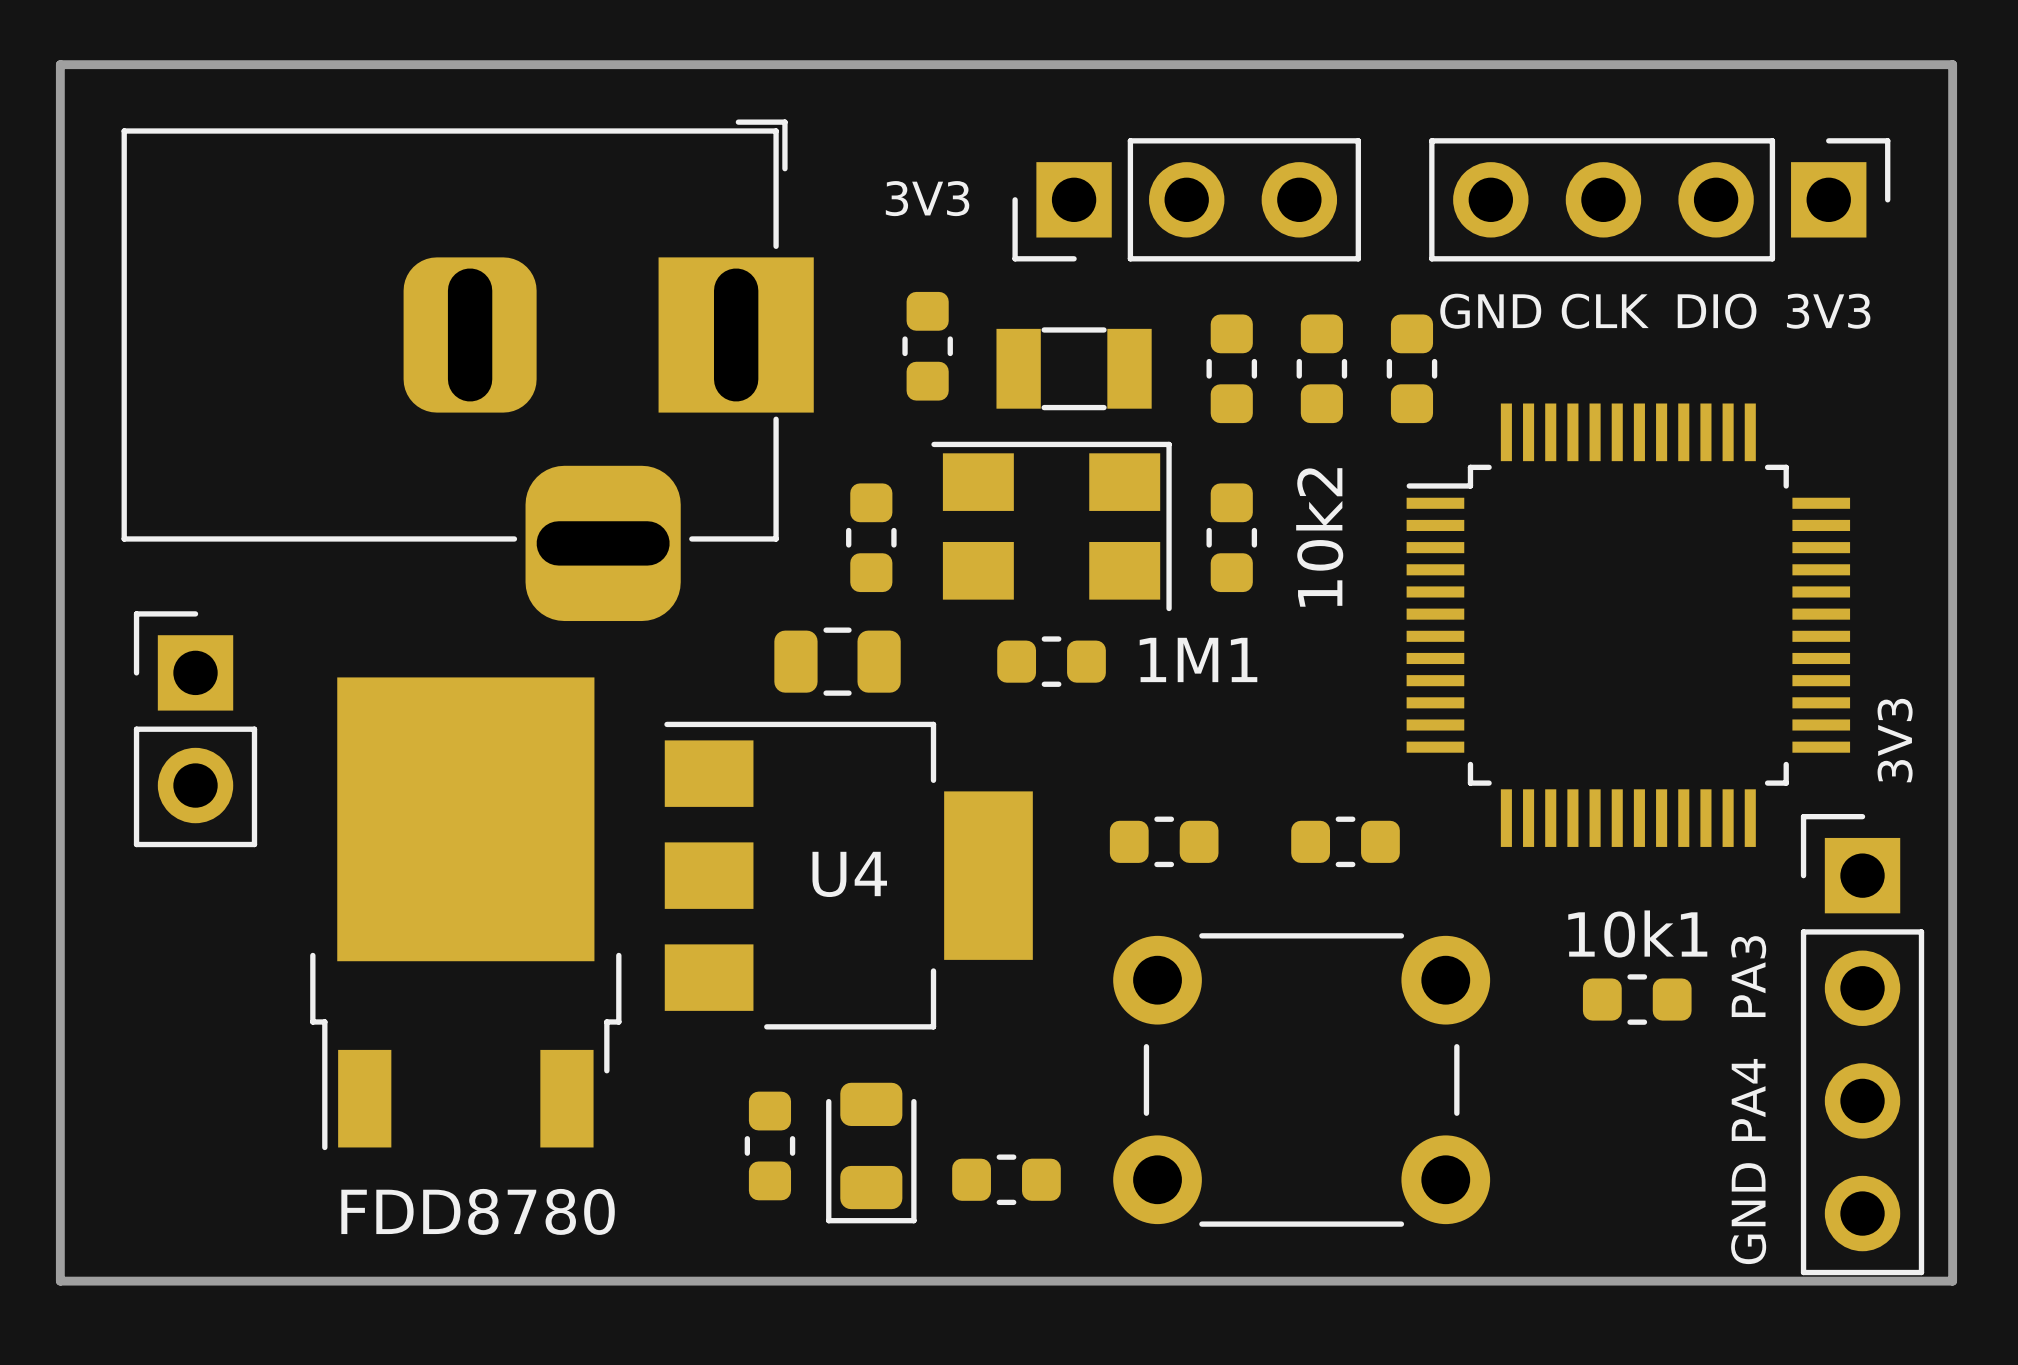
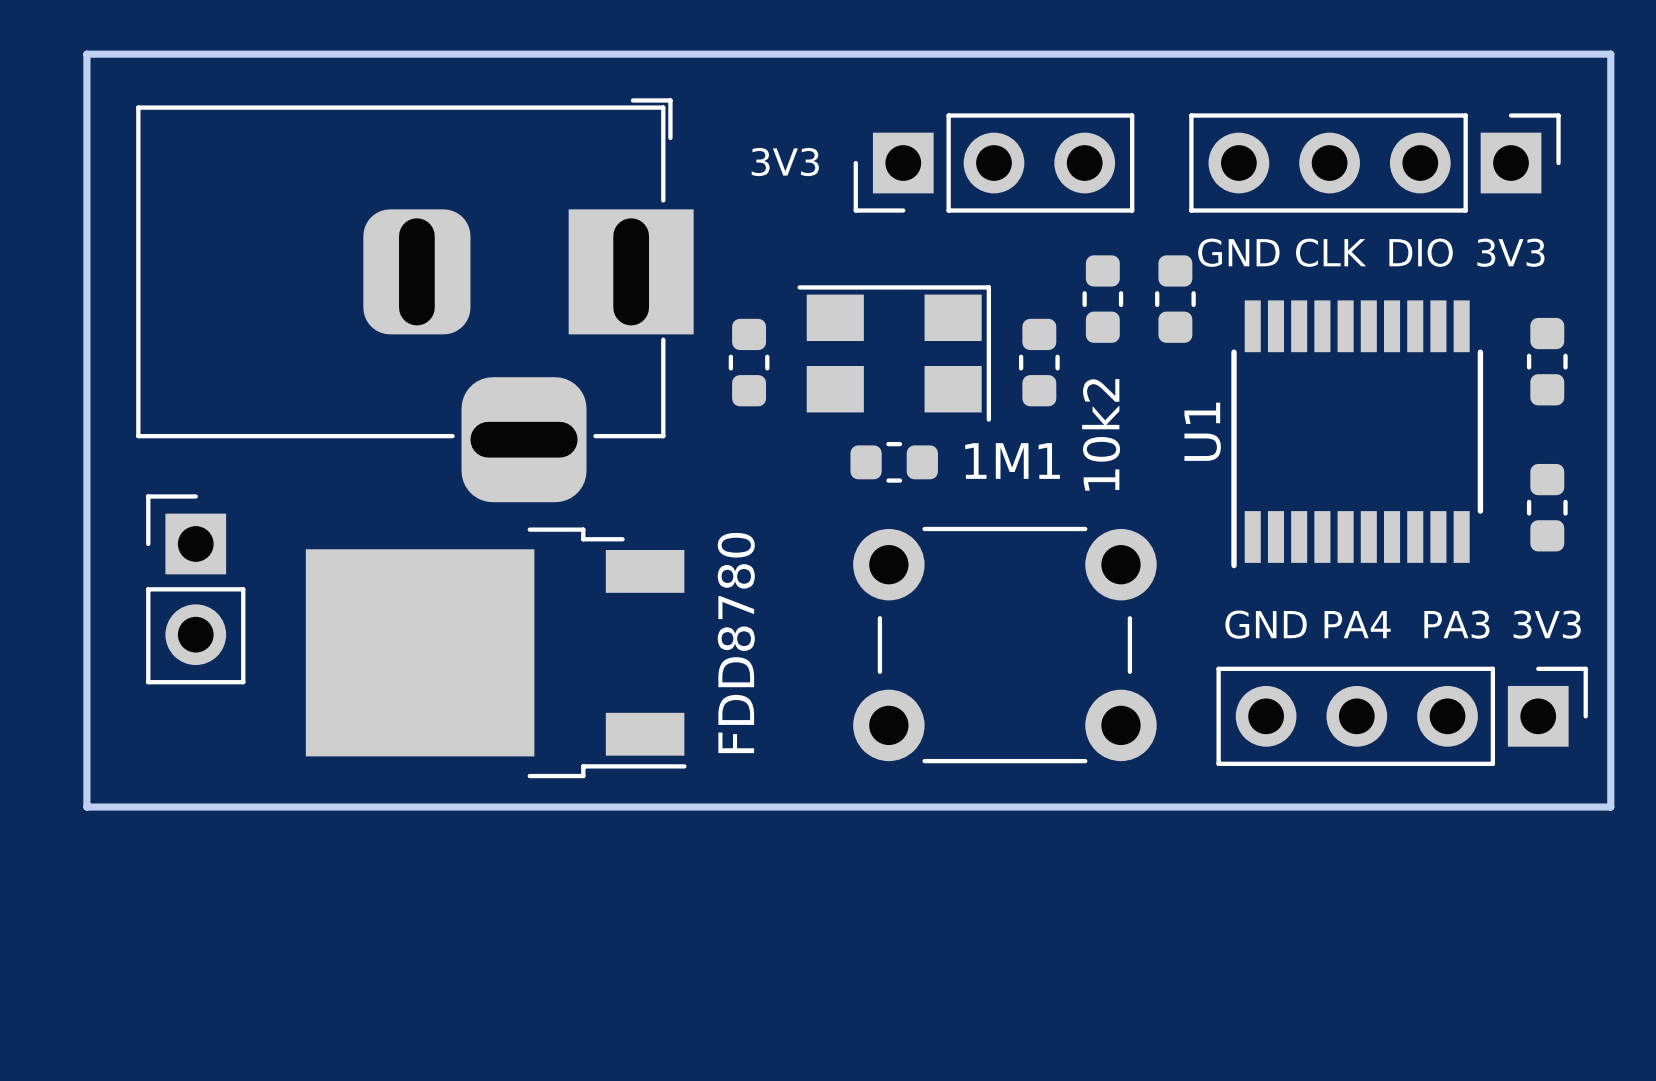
part: (927, 346) -> none
part: (1074, 368) -> none
part: (1231, 368) -> none
part: none -> (1547, 361)
part: none -> (749, 362)
part: none -> (1039, 362)
part position: (1051, 526) -> (894, 353)
U1: none -> (1357, 434)
part: (871, 537) -> none
part: (1231, 537) -> none
part: (1628, 625) -> none
part: none -> (1547, 507)
part: (837, 661) -> none
1M1 position: (1051, 661) -> (894, 462)
text rotation: 0° (1895, 740) -> 90° clockwise (1547, 624)
part: (1164, 841) -> none
part: (1345, 841) -> none
U4: (848, 875) -> none
FDD8780 rotation: 0° (465, 913) -> 90° counterclockwise (496, 652)
text rotation: 0° (1748, 976) -> 90° clockwise (1456, 624)
text position: PA3 (1748, 976) -> PA3 (1456, 624)
board edge: (60, 999) (60, 1281) (1952, 1281) (1952, 999) -> (86, 807) (1610, 807)
10k1: (1637, 999) -> none
part rotation: 0° (1862, 1044) -> 90° clockwise (1402, 716)
part position: (1301, 1079) -> (1004, 645)
text rotation: 0° (1748, 1099) -> 90° clockwise (1357, 624)
text position: PA4 (1748, 1099) -> PA4 (1357, 624)
part: (769, 1145) -> none
part: (871, 1153) -> none
part: (1006, 1179) -> none
text rotation: 0° (1748, 1213) -> 90° clockwise (1266, 624)
text position: GND (1748, 1213) -> GND (1266, 624)

